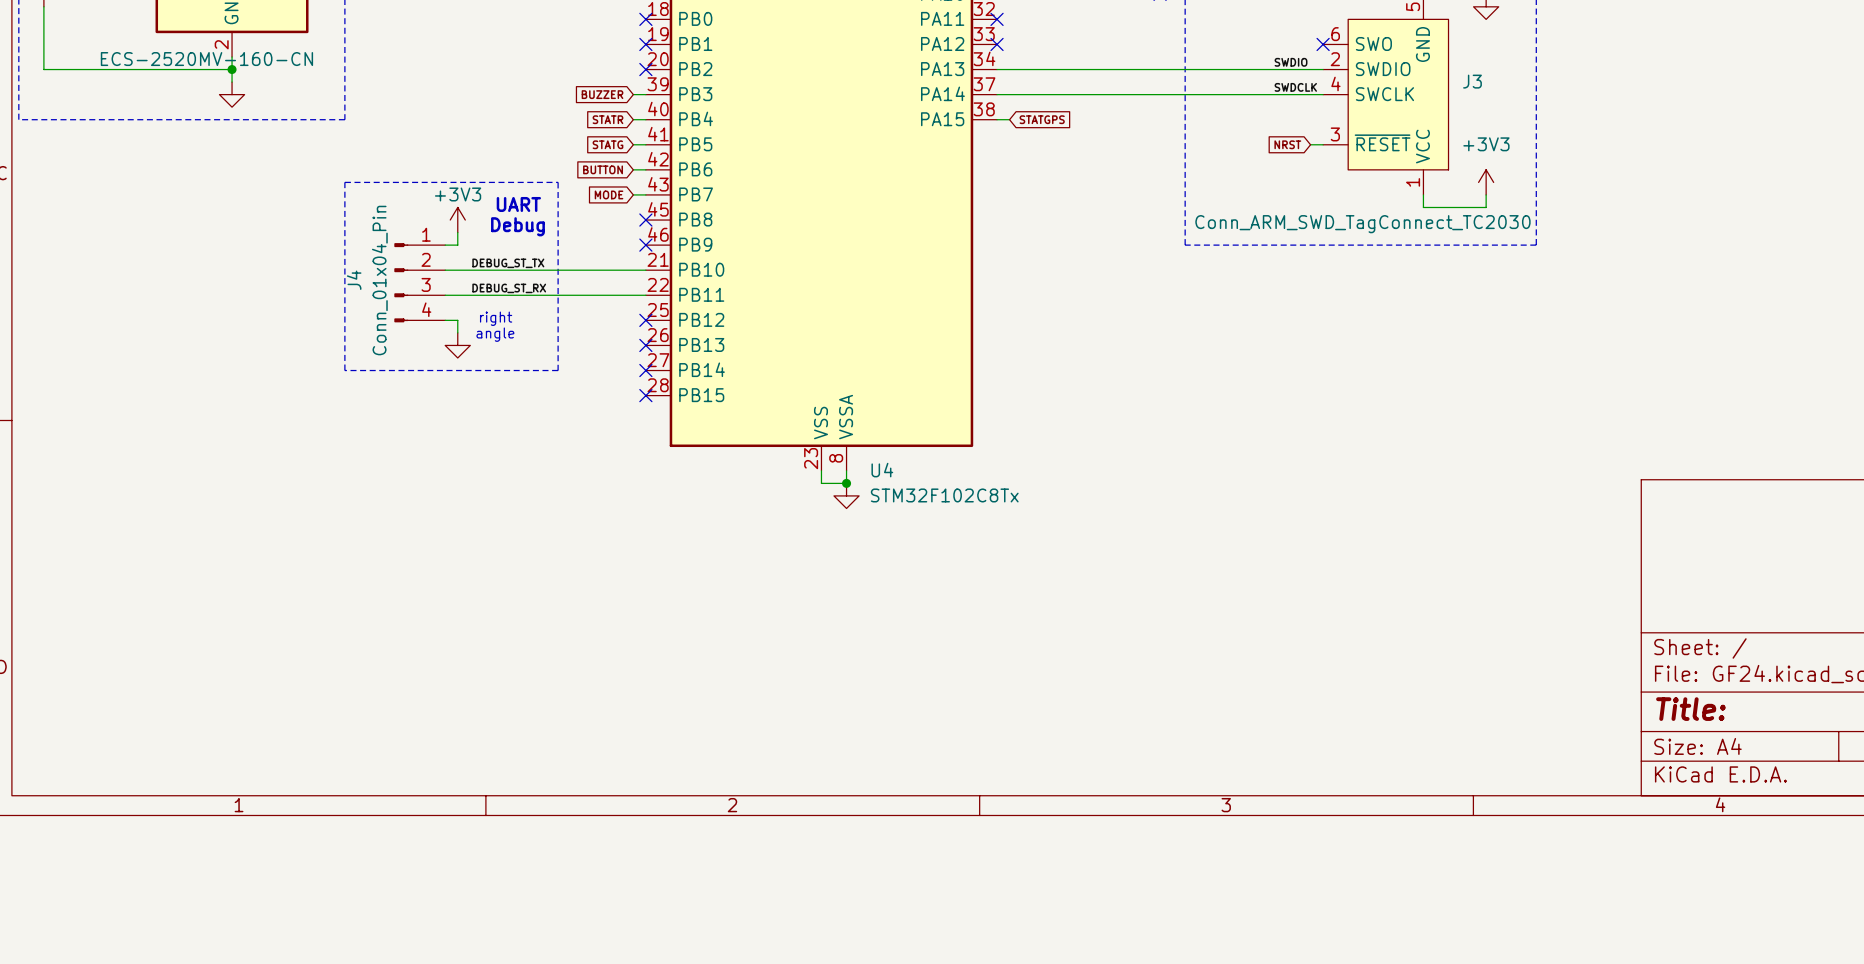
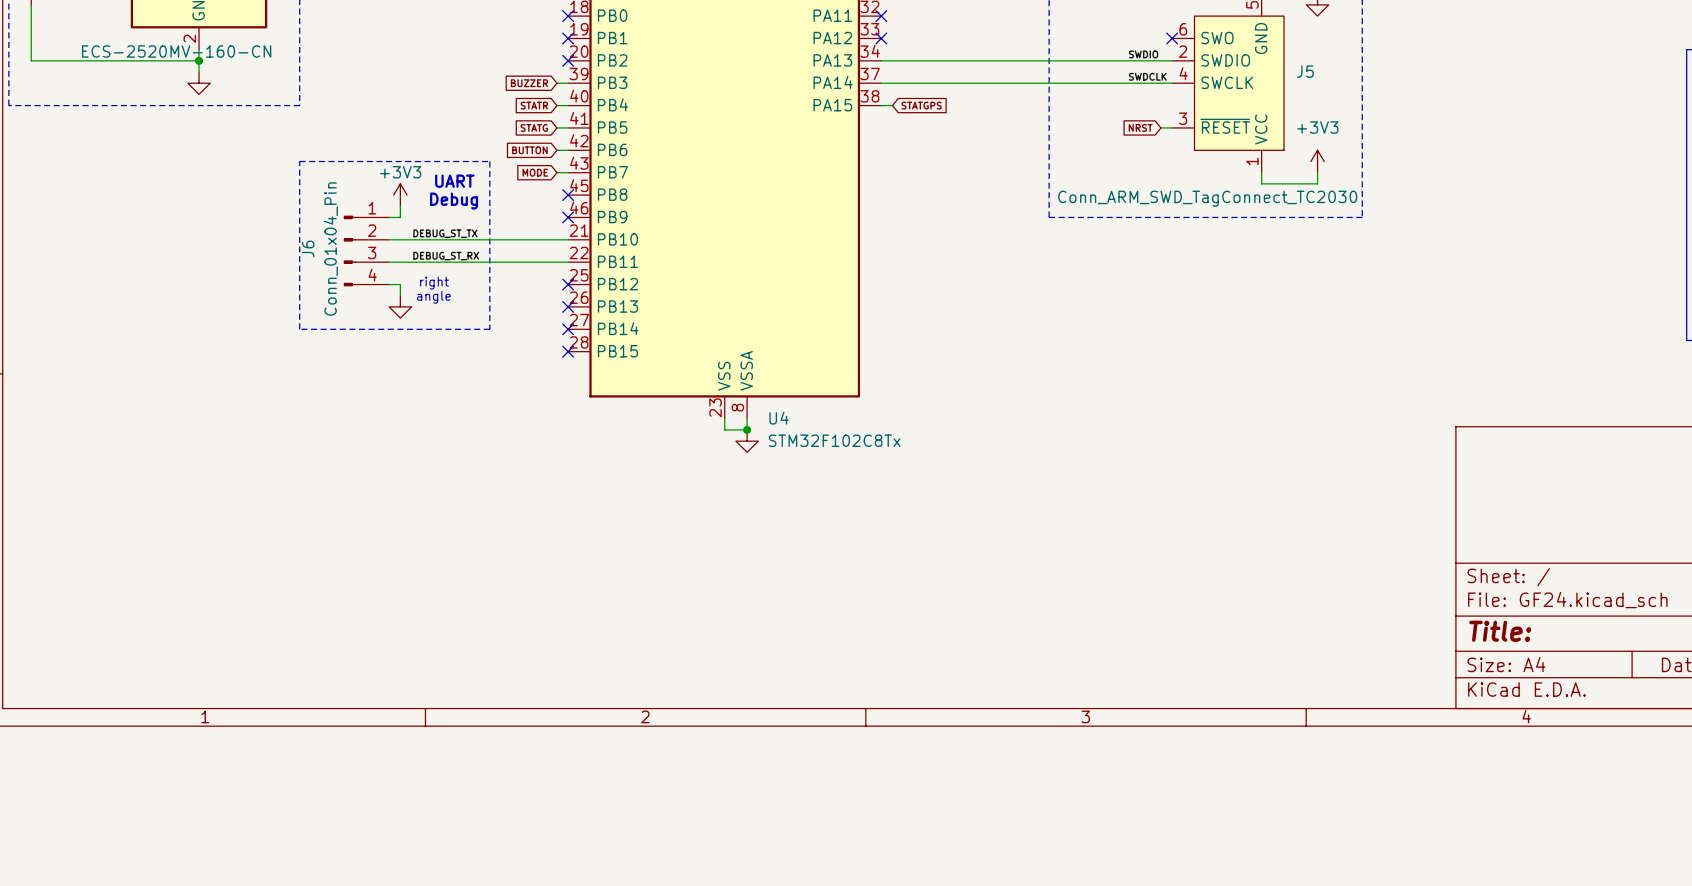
J3 name: J3 (1472, 81) -> J5 (1305, 71)
J4 name: J4 (354, 280) -> J6 (308, 249)

